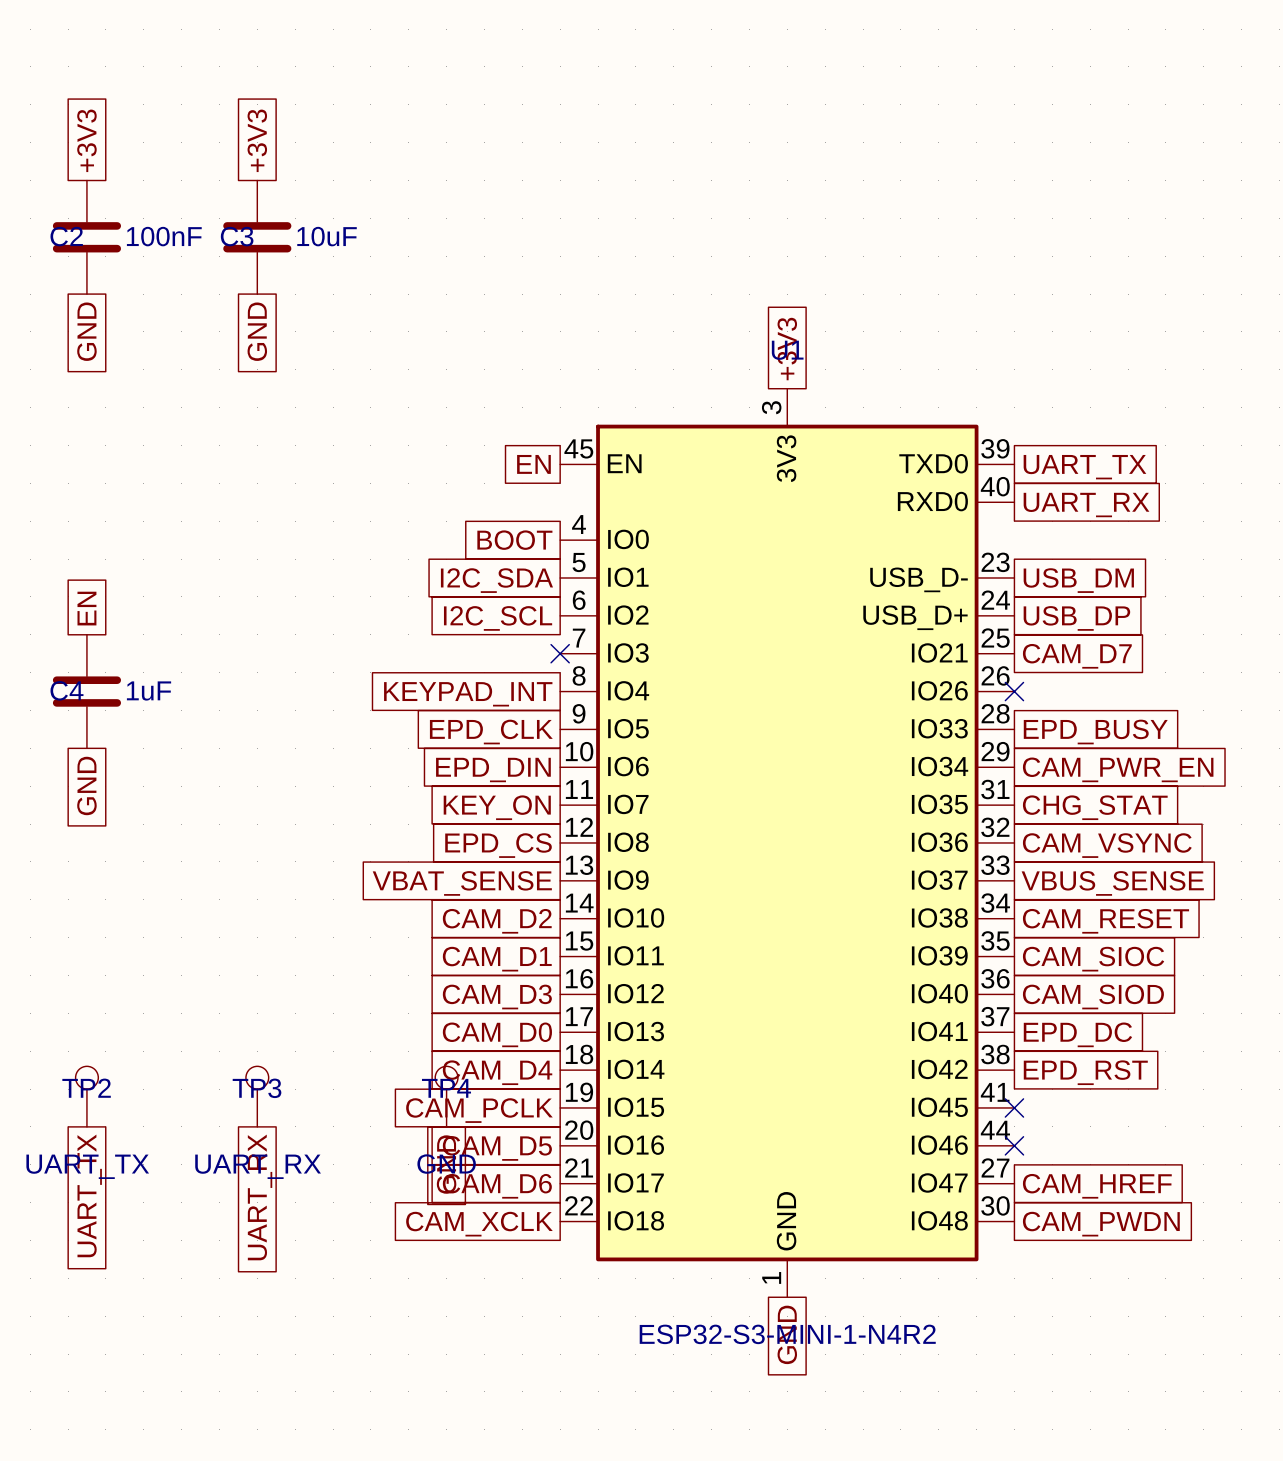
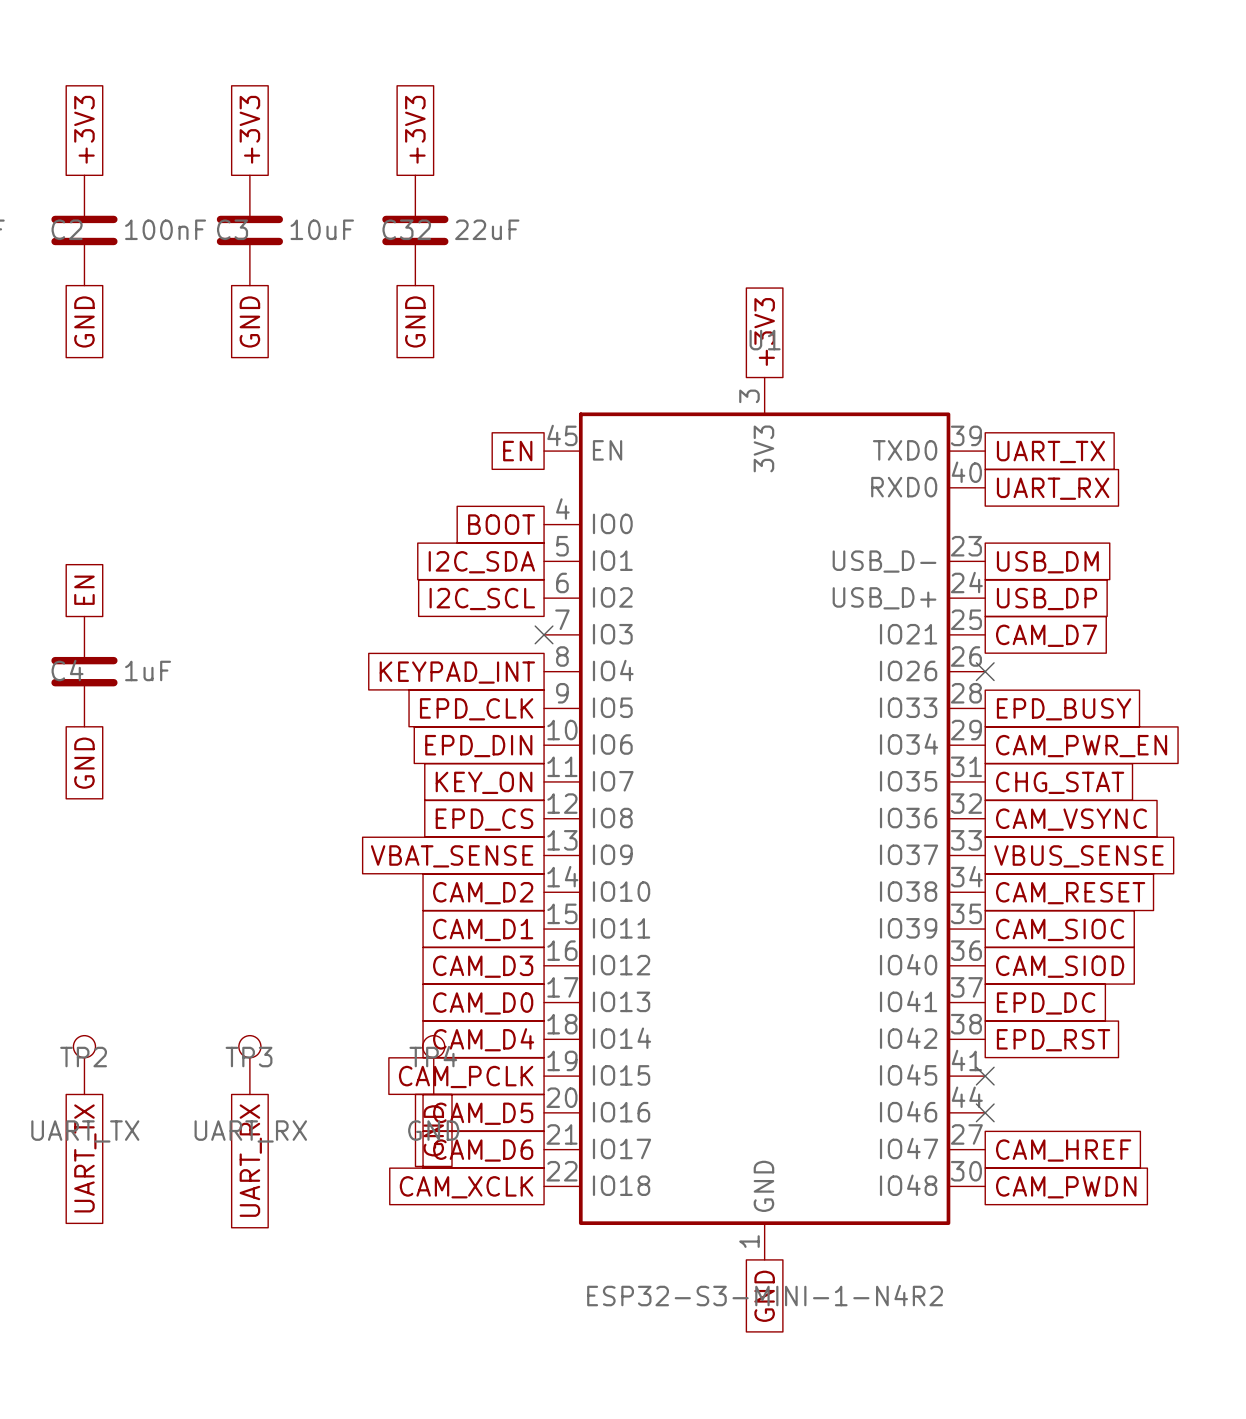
global label: none -> +3V3 (415, 129)
C32: none -> 22uF (415, 230)
global label: none -> GND (415, 321)

